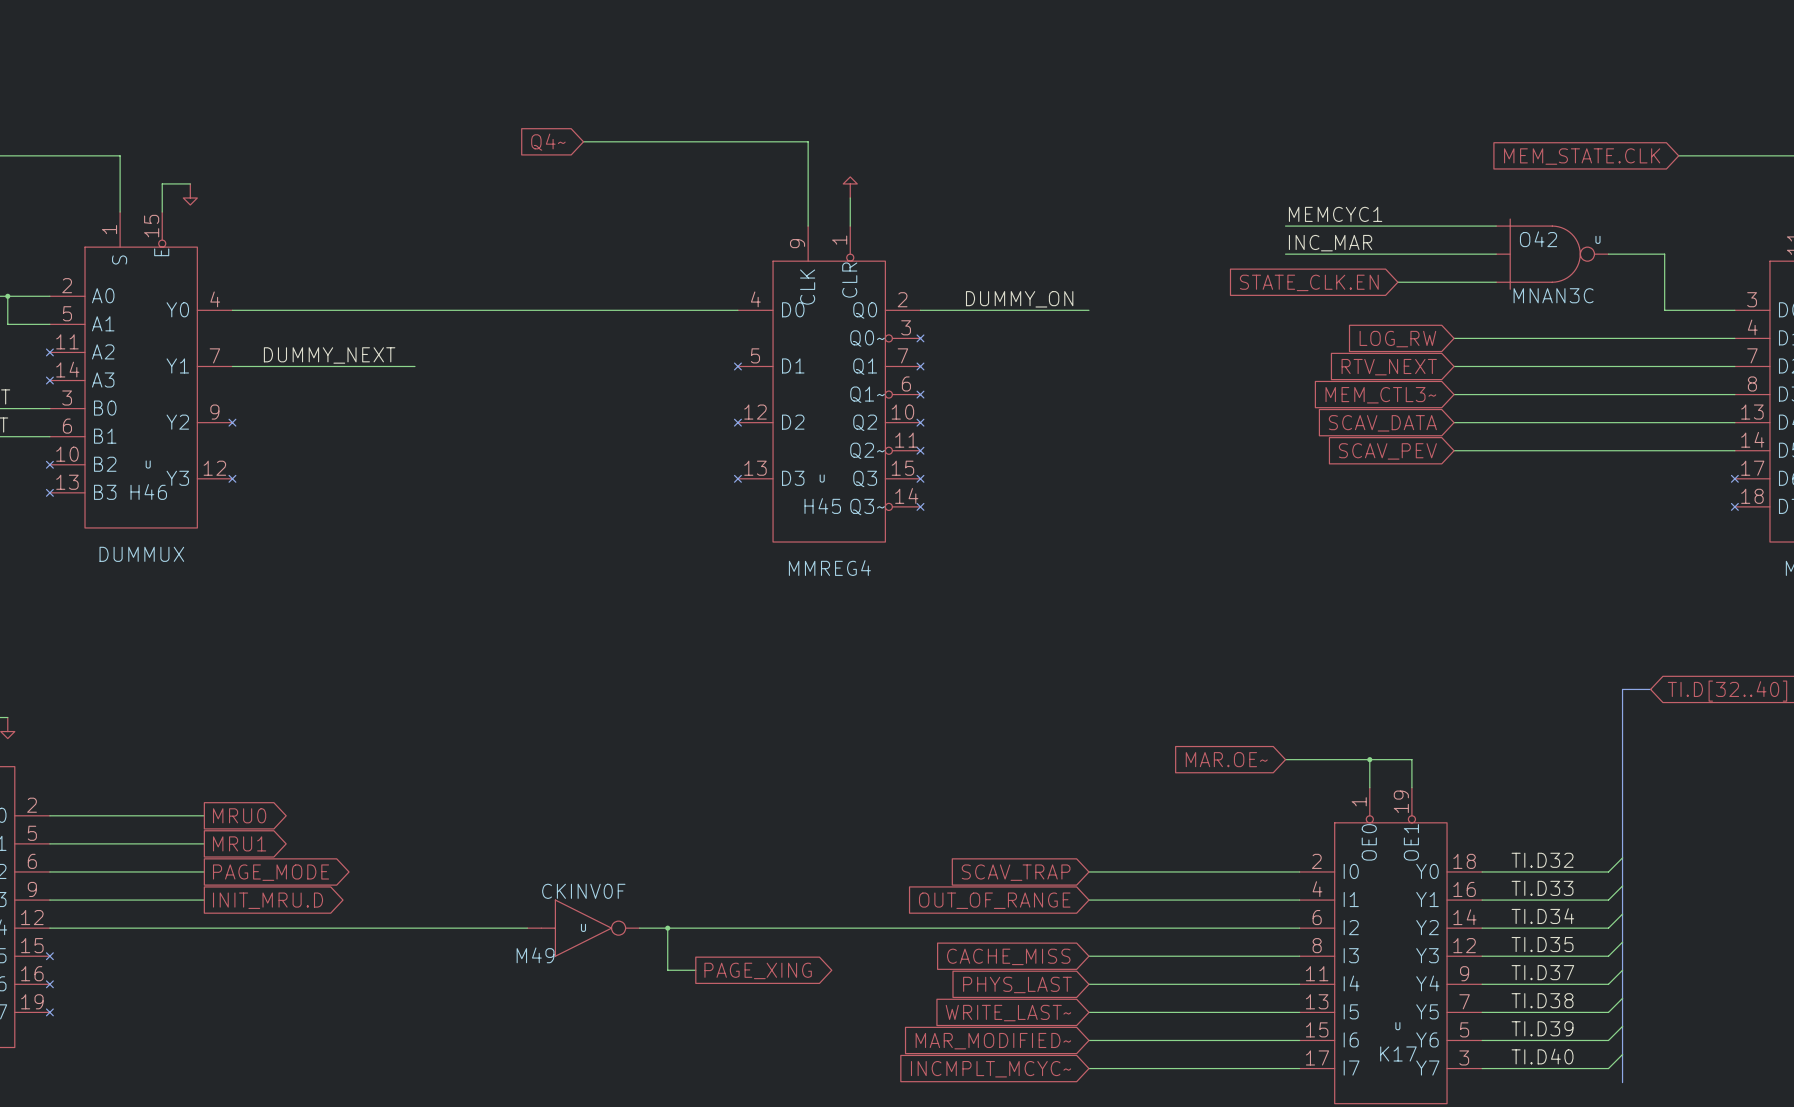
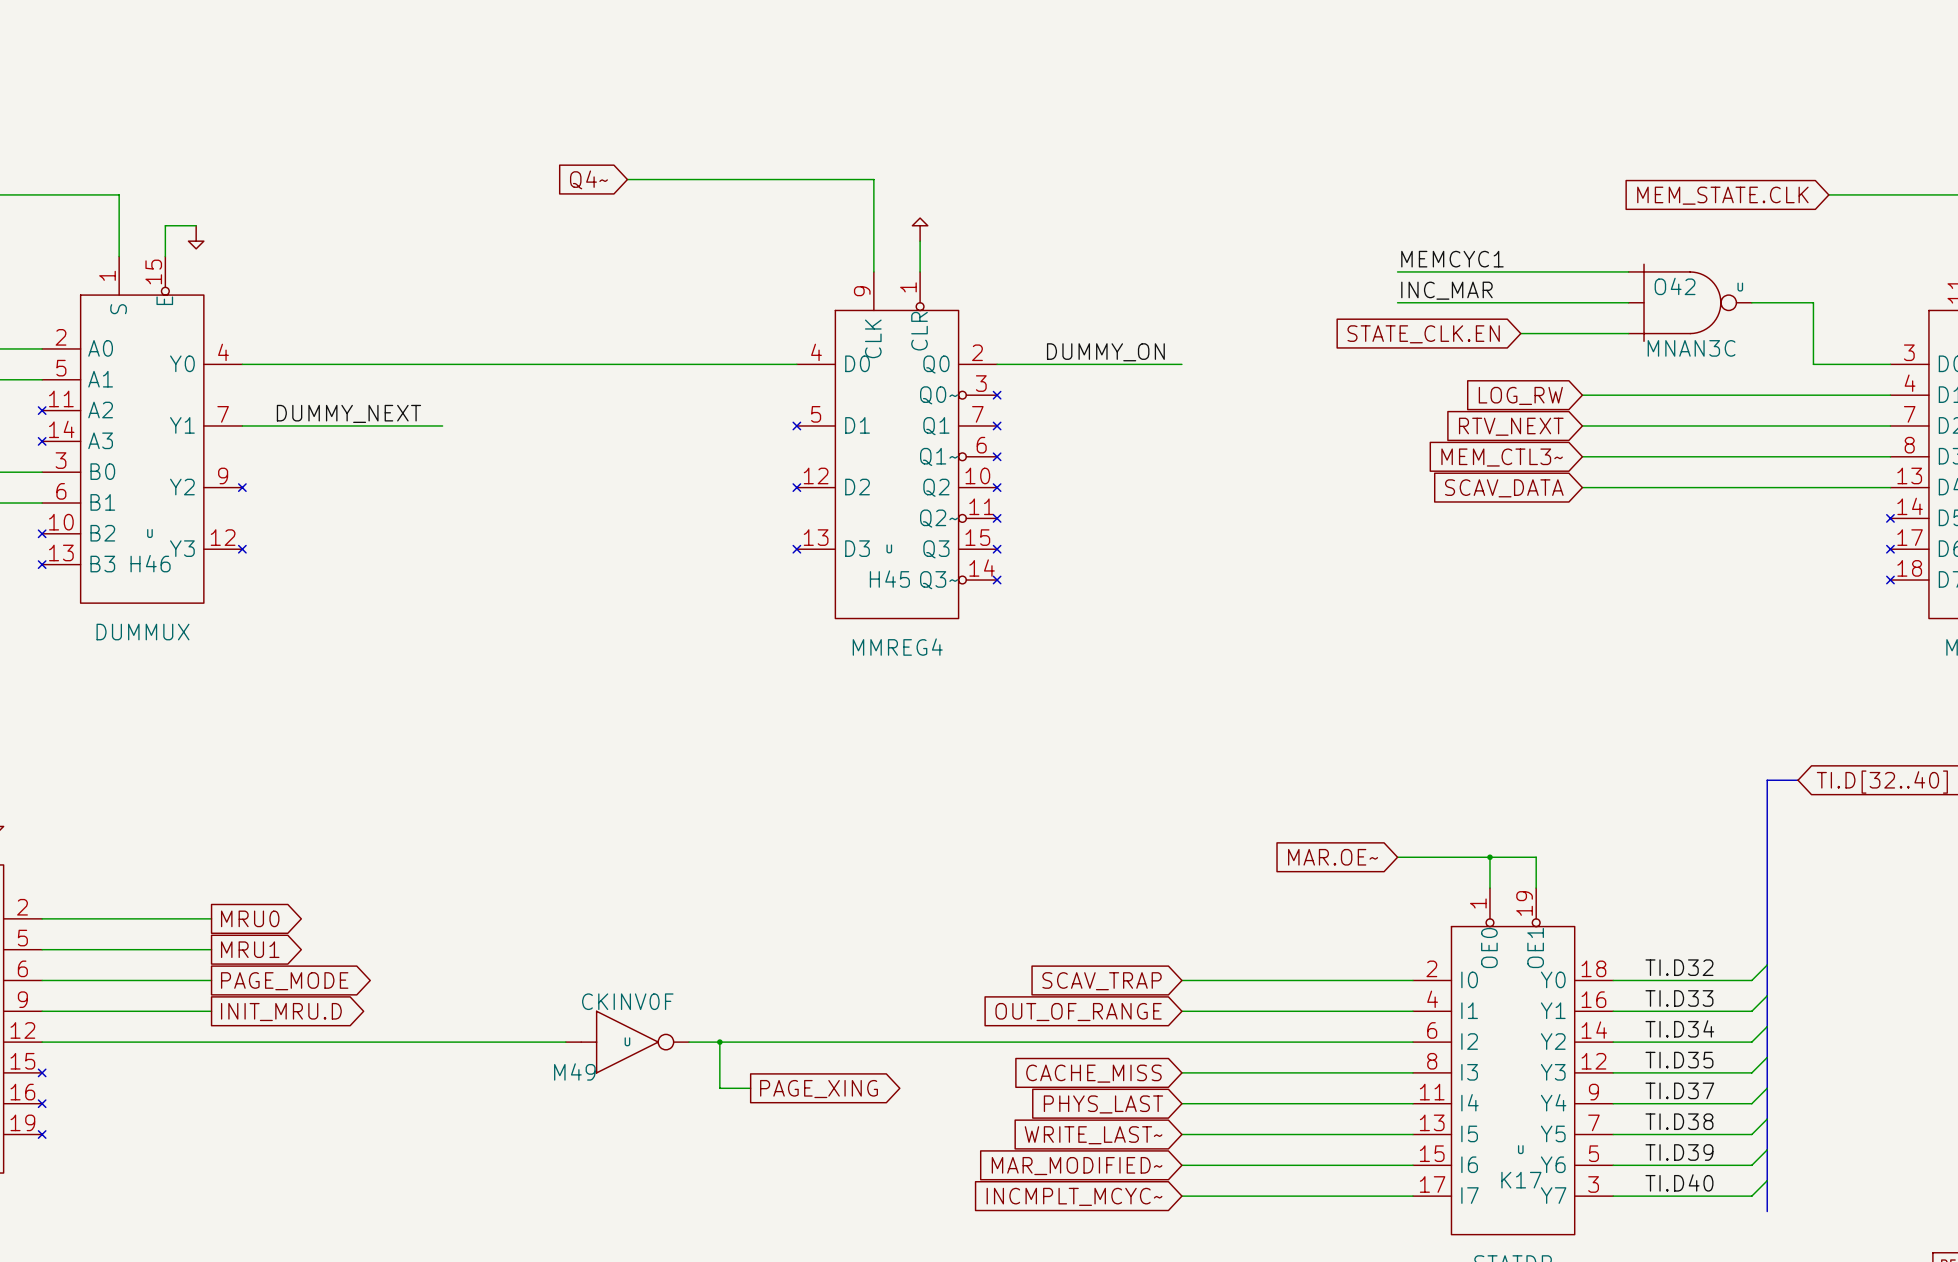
wire: (1454, 450) (1734, 450) -> none
no-connect mark: none -> (1890, 518)
global label: SCAV_PEV (1387, 451) -> none

